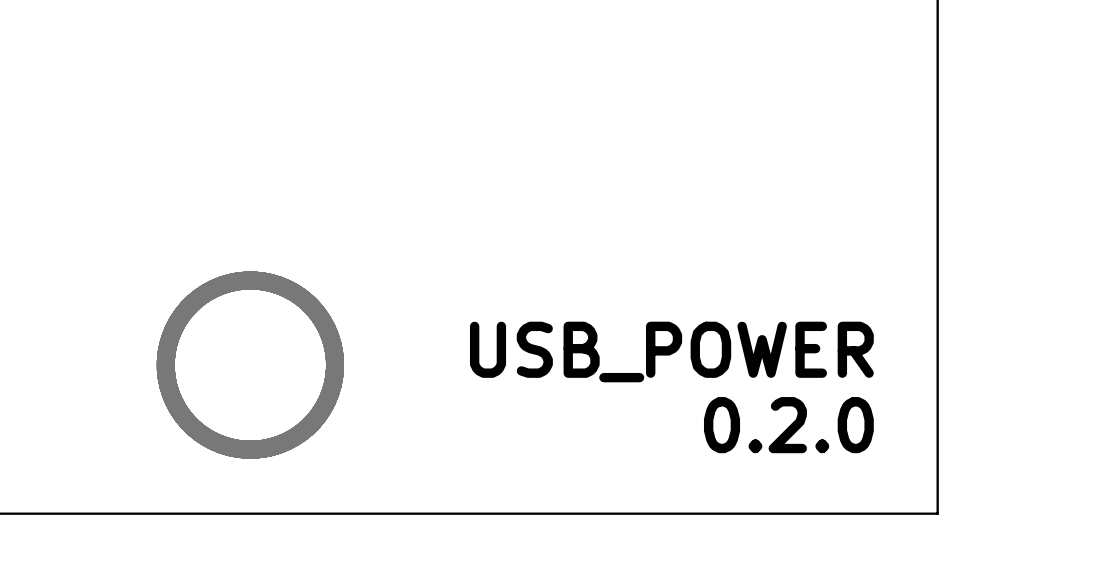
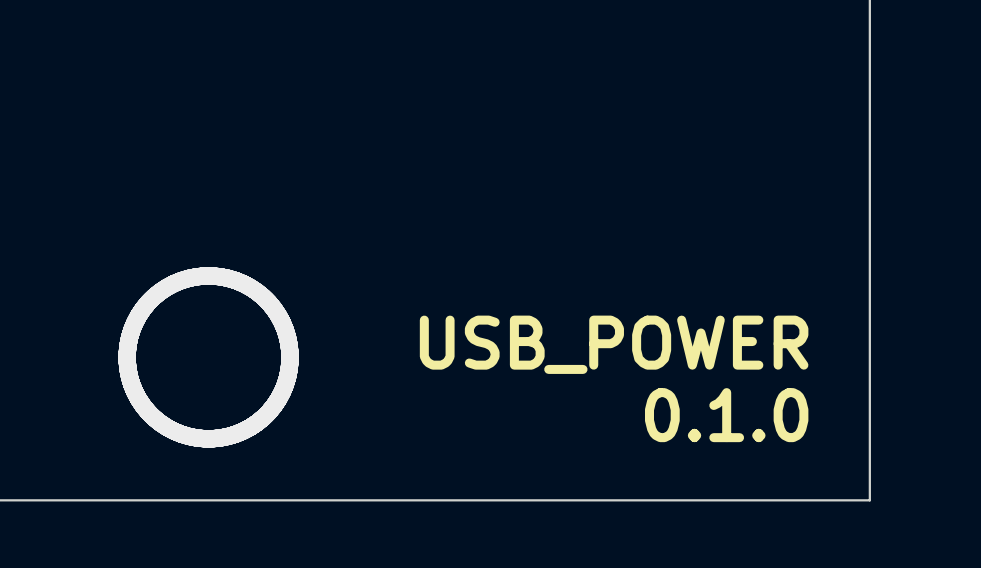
text: 0.2.0 (788, 425) -> 0.1.0 (726, 415)

